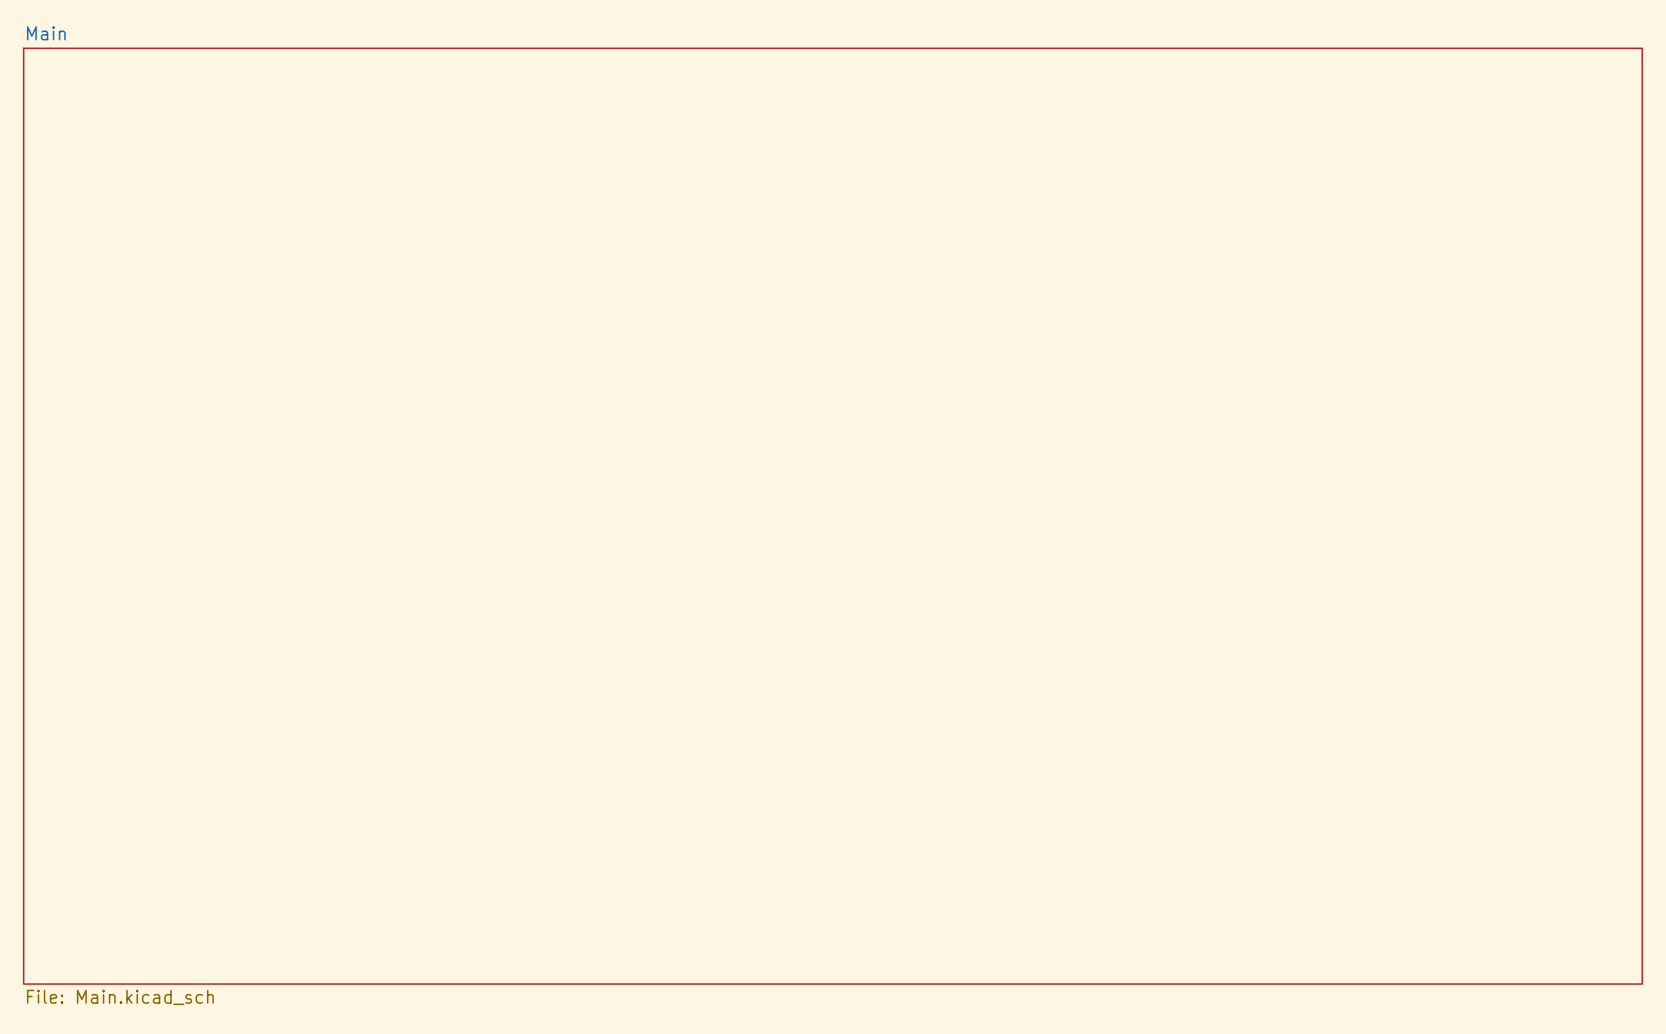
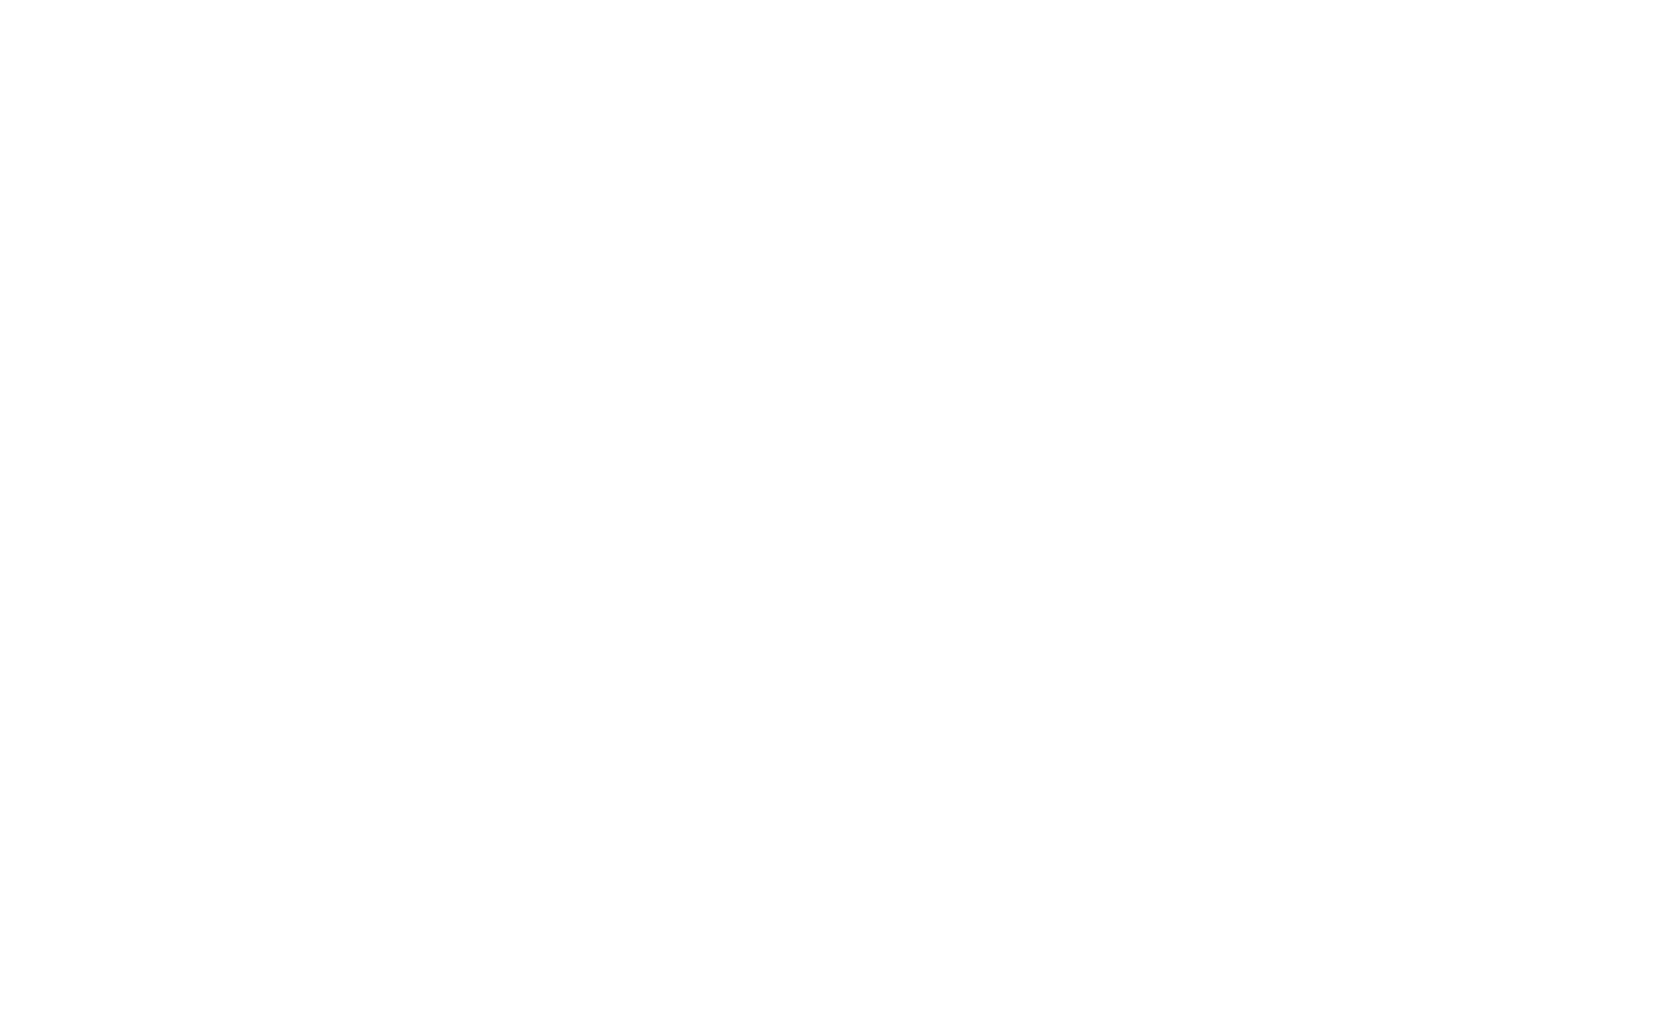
sheet Main: File: Main.kicad_sch (832, 516) -> none

